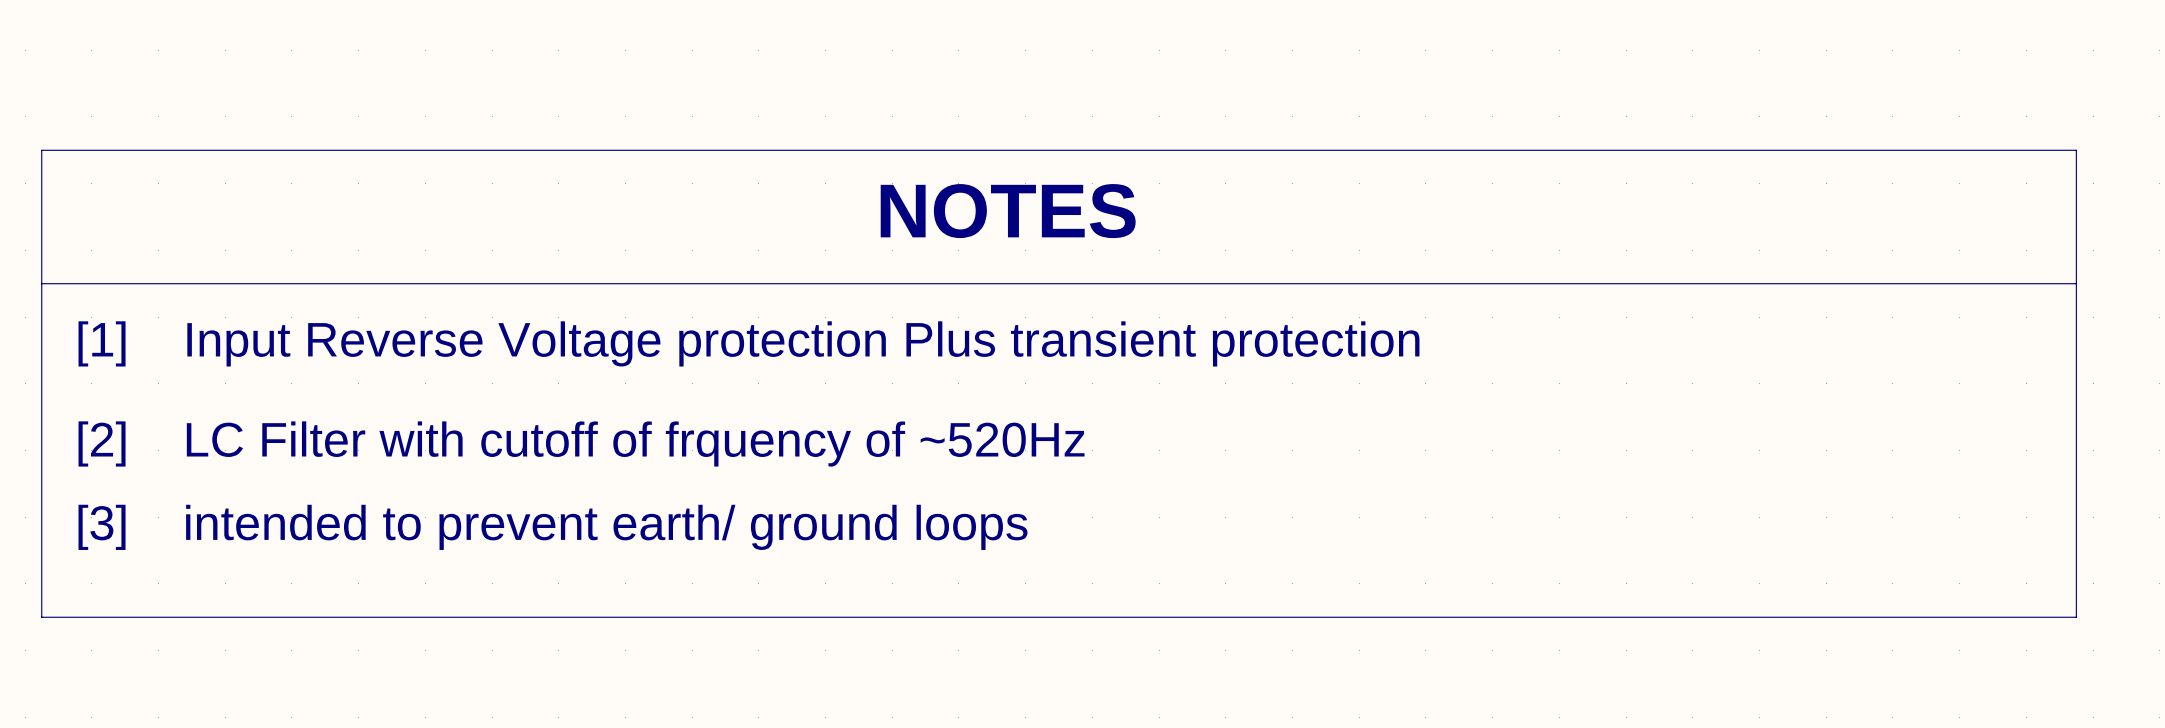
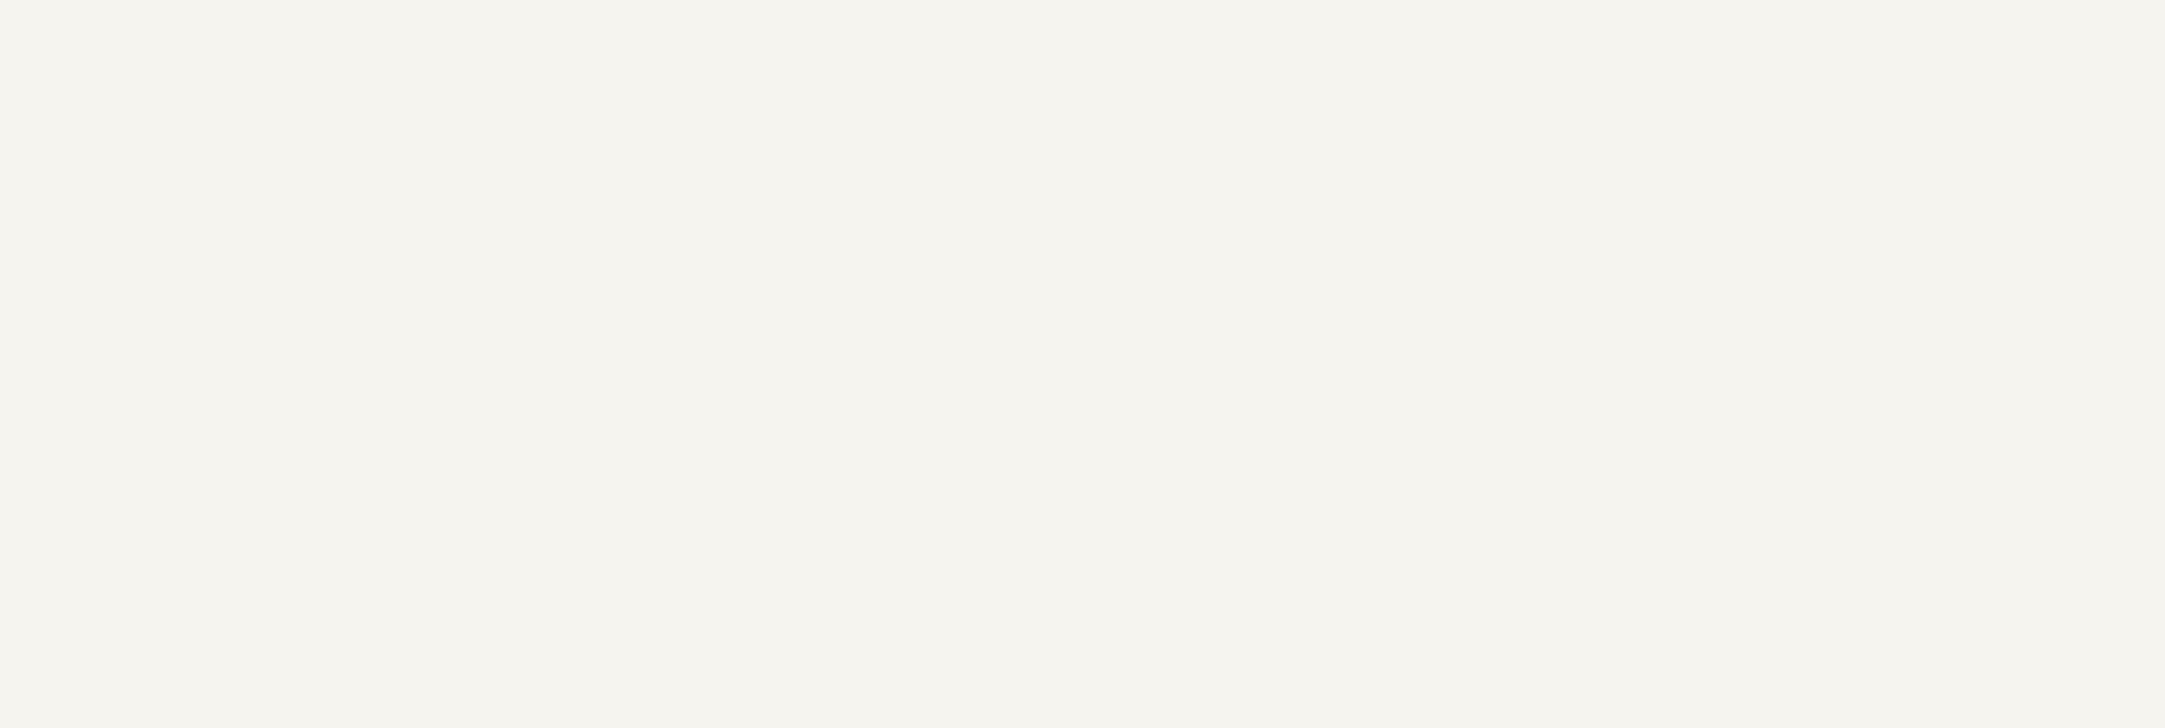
line: (41, 150) (2076, 150) (2076, 617) (41, 617) (41, 150) -> none
text: NOTES (1008, 211) -> none
line: (41, 283) (2076, 283) -> none
text: [1] Input Reverse Voltage protection Plus transient protection (748, 343) -> none
text: [2] LC Filter with cutoff of frquency of ~520Hz (581, 443) -> none
text: [3] intended to prevent earth/ ground loops (553, 527) -> none

